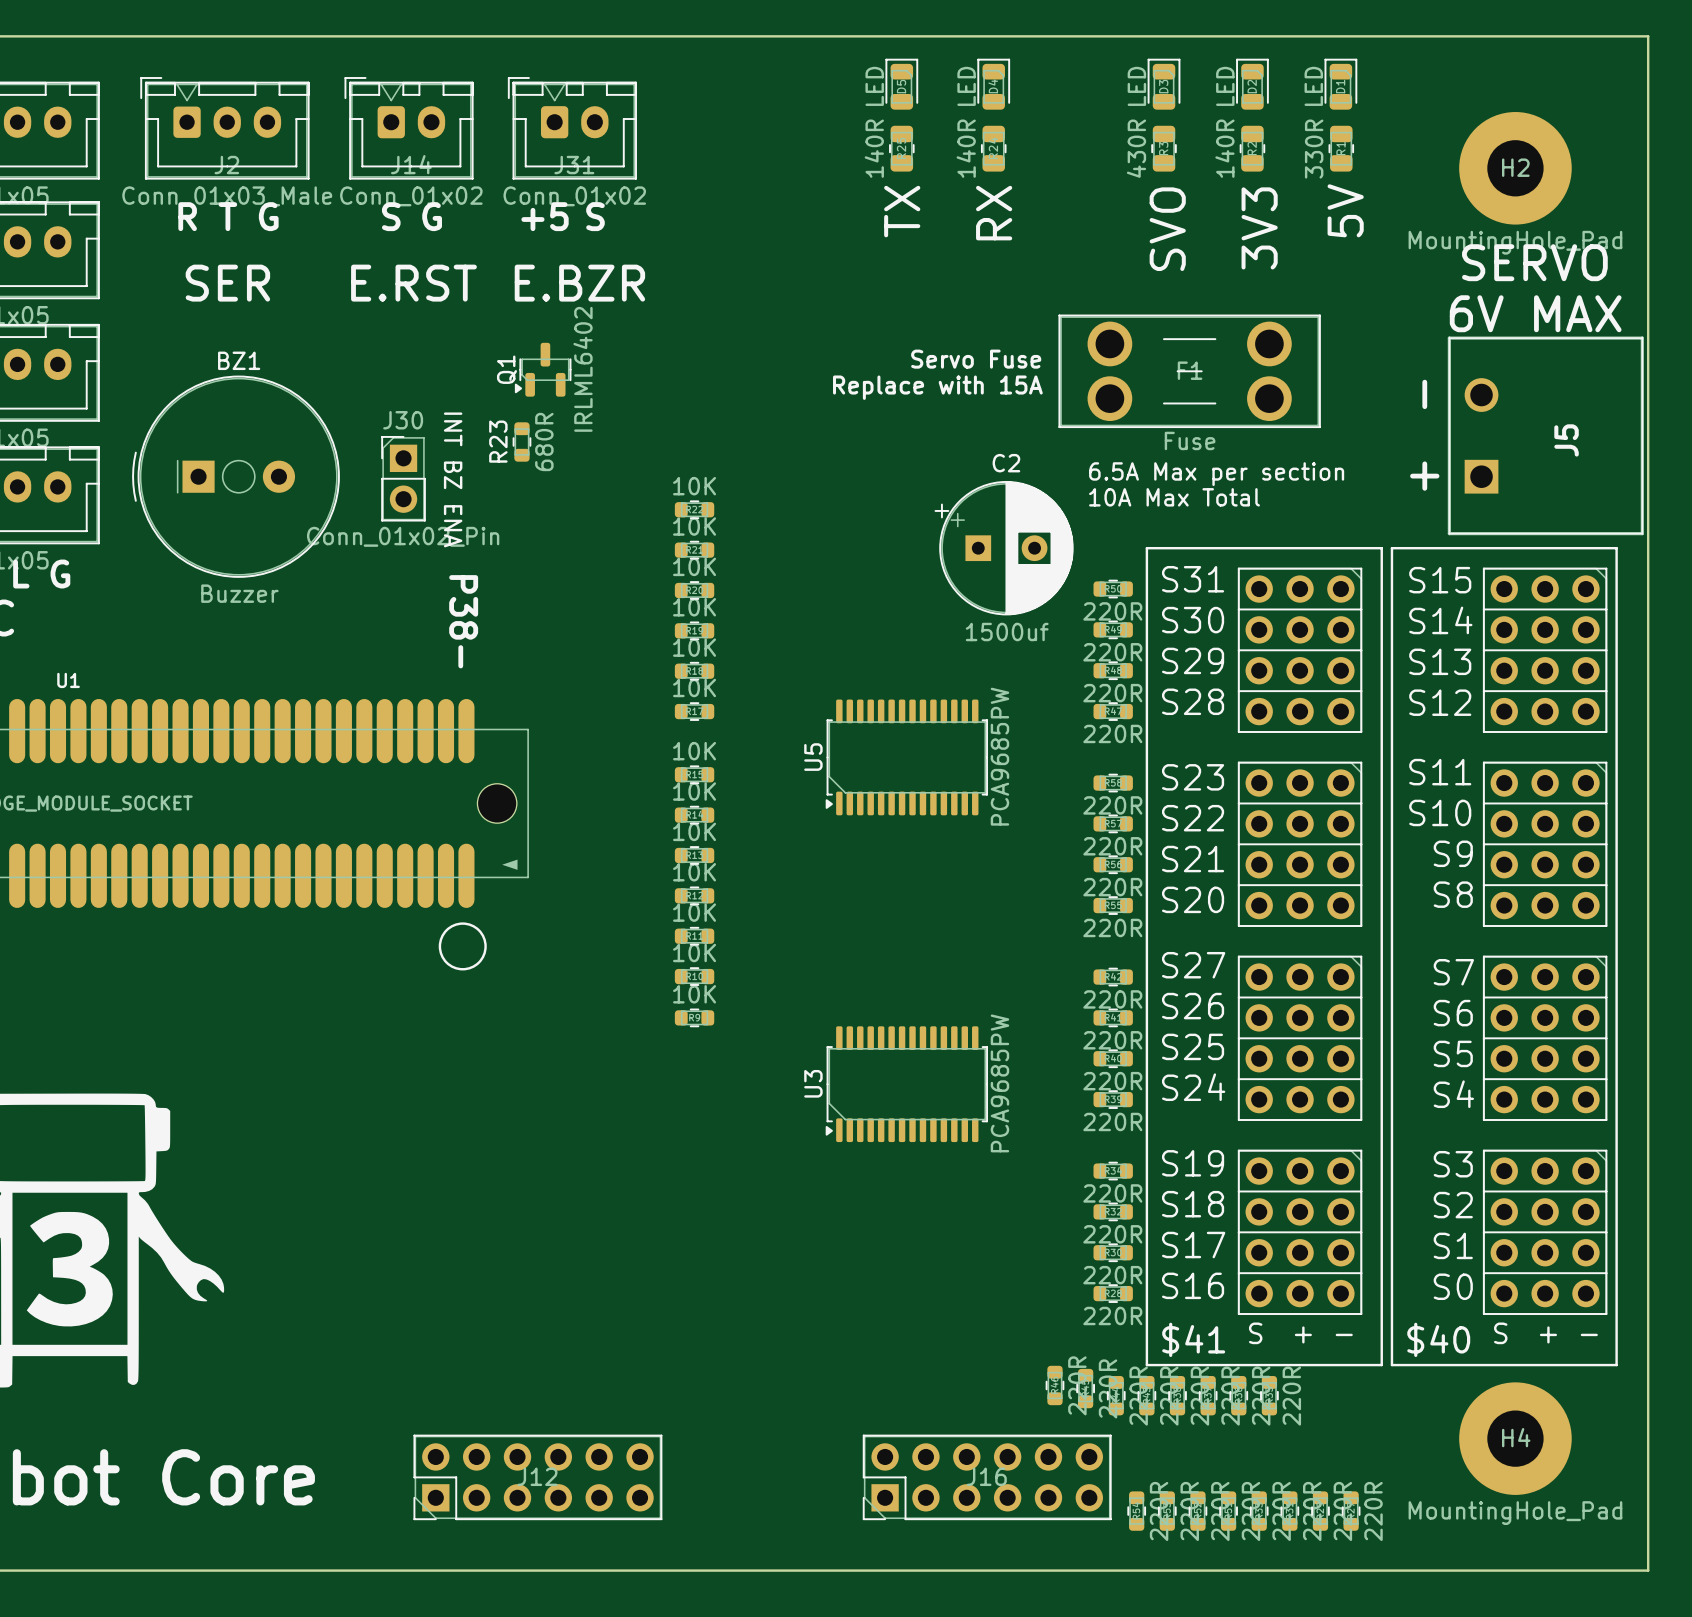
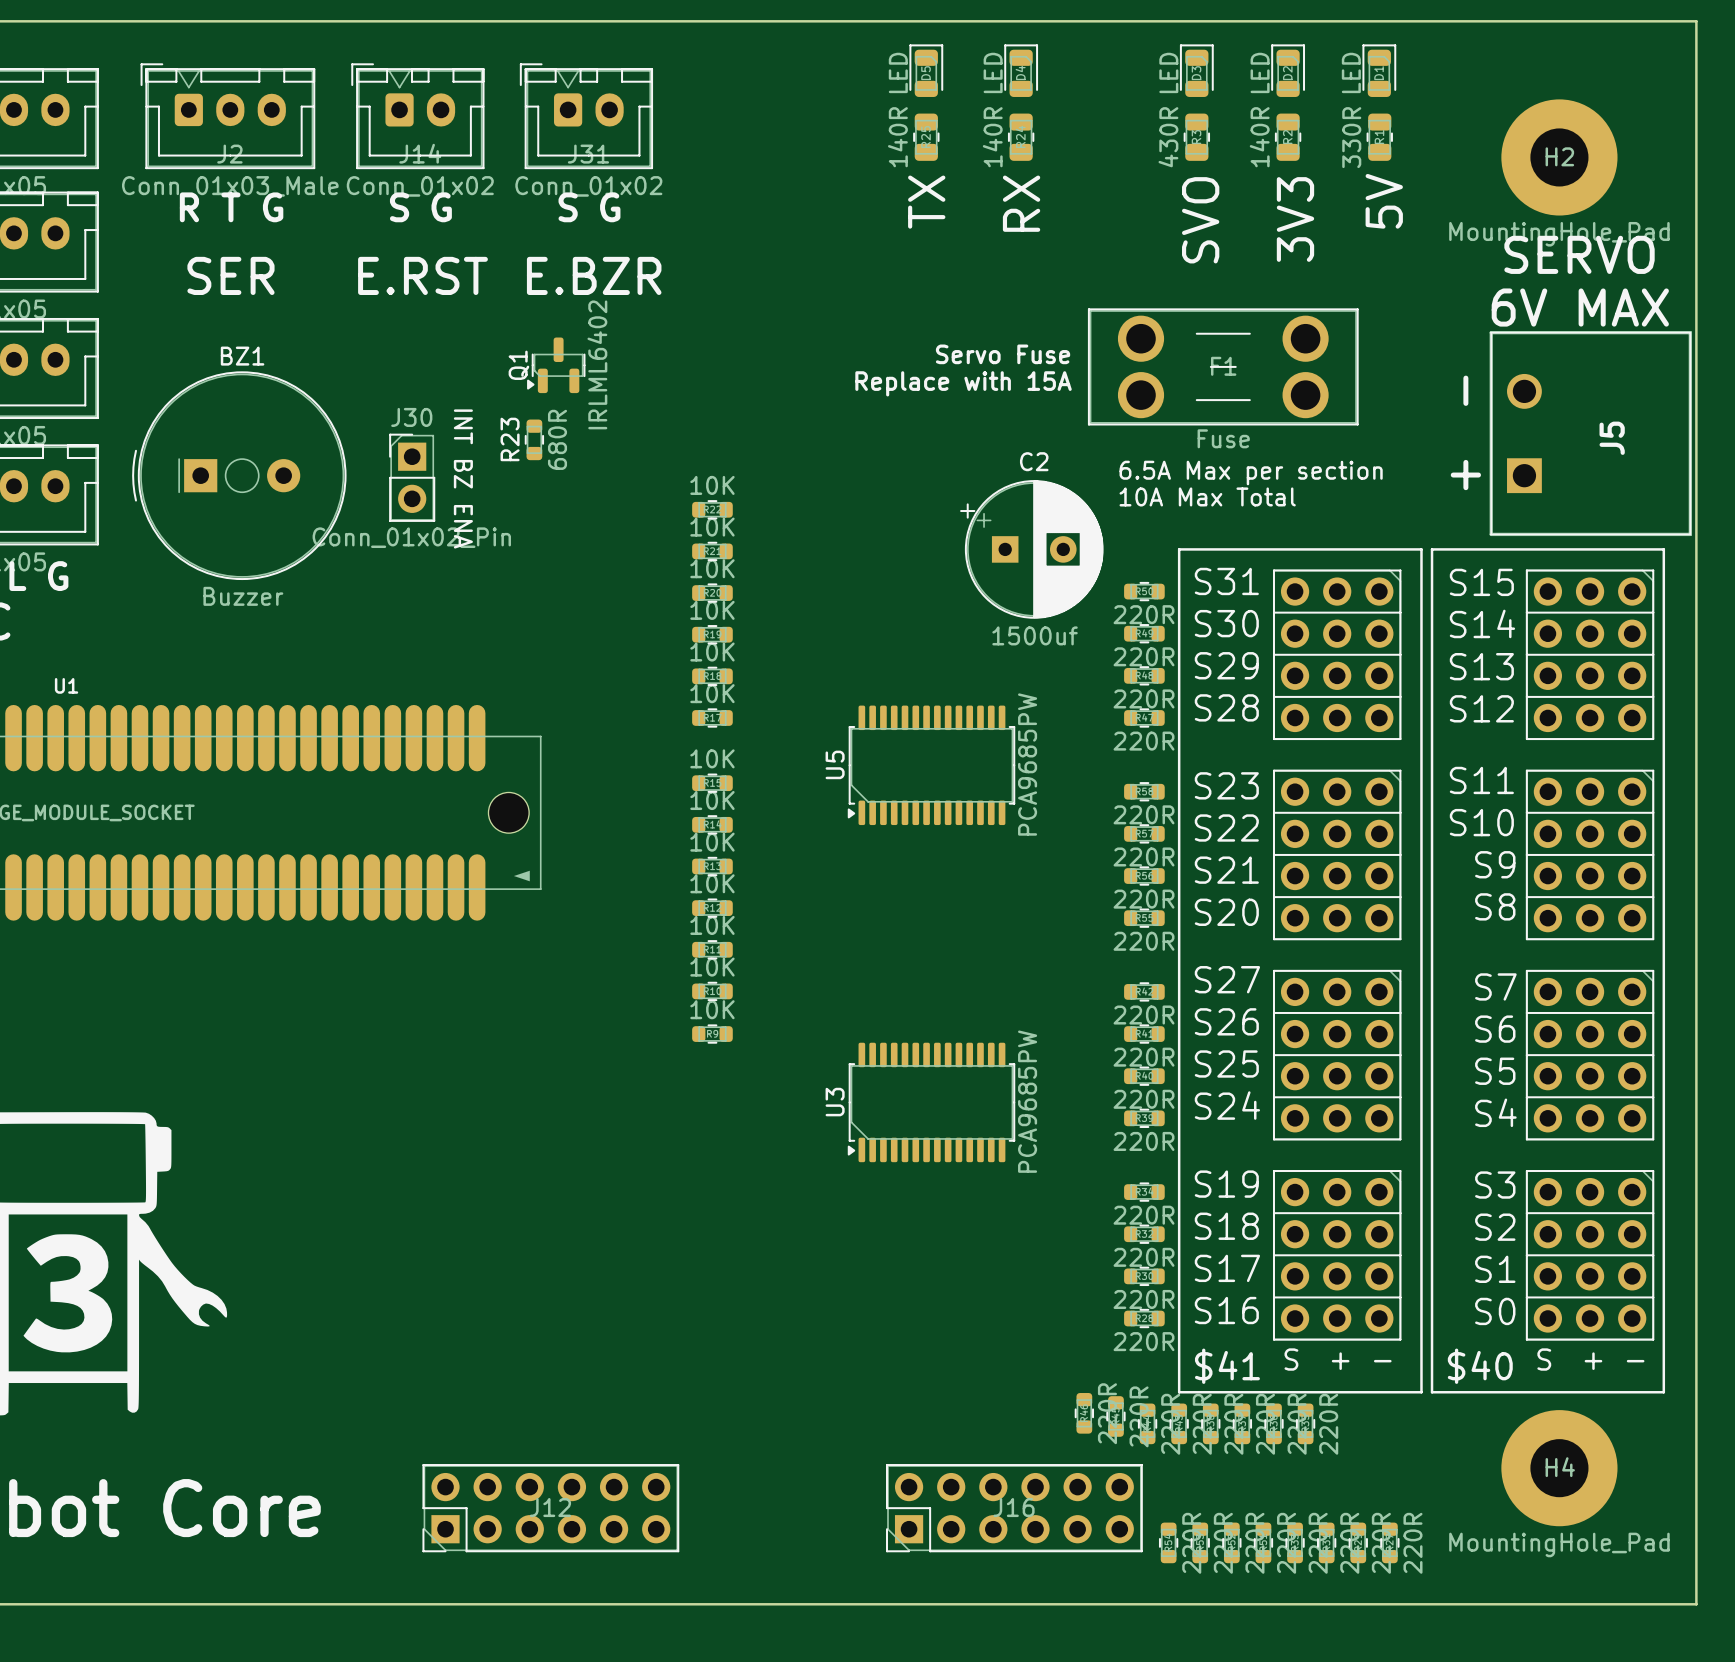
text: +5 (545, 216) -> S (568, 207)
text: S (595, 216) -> G (610, 207)
text: P38- (463, 621) -> none
drawing: [438, 922, 487, 971] -> none

